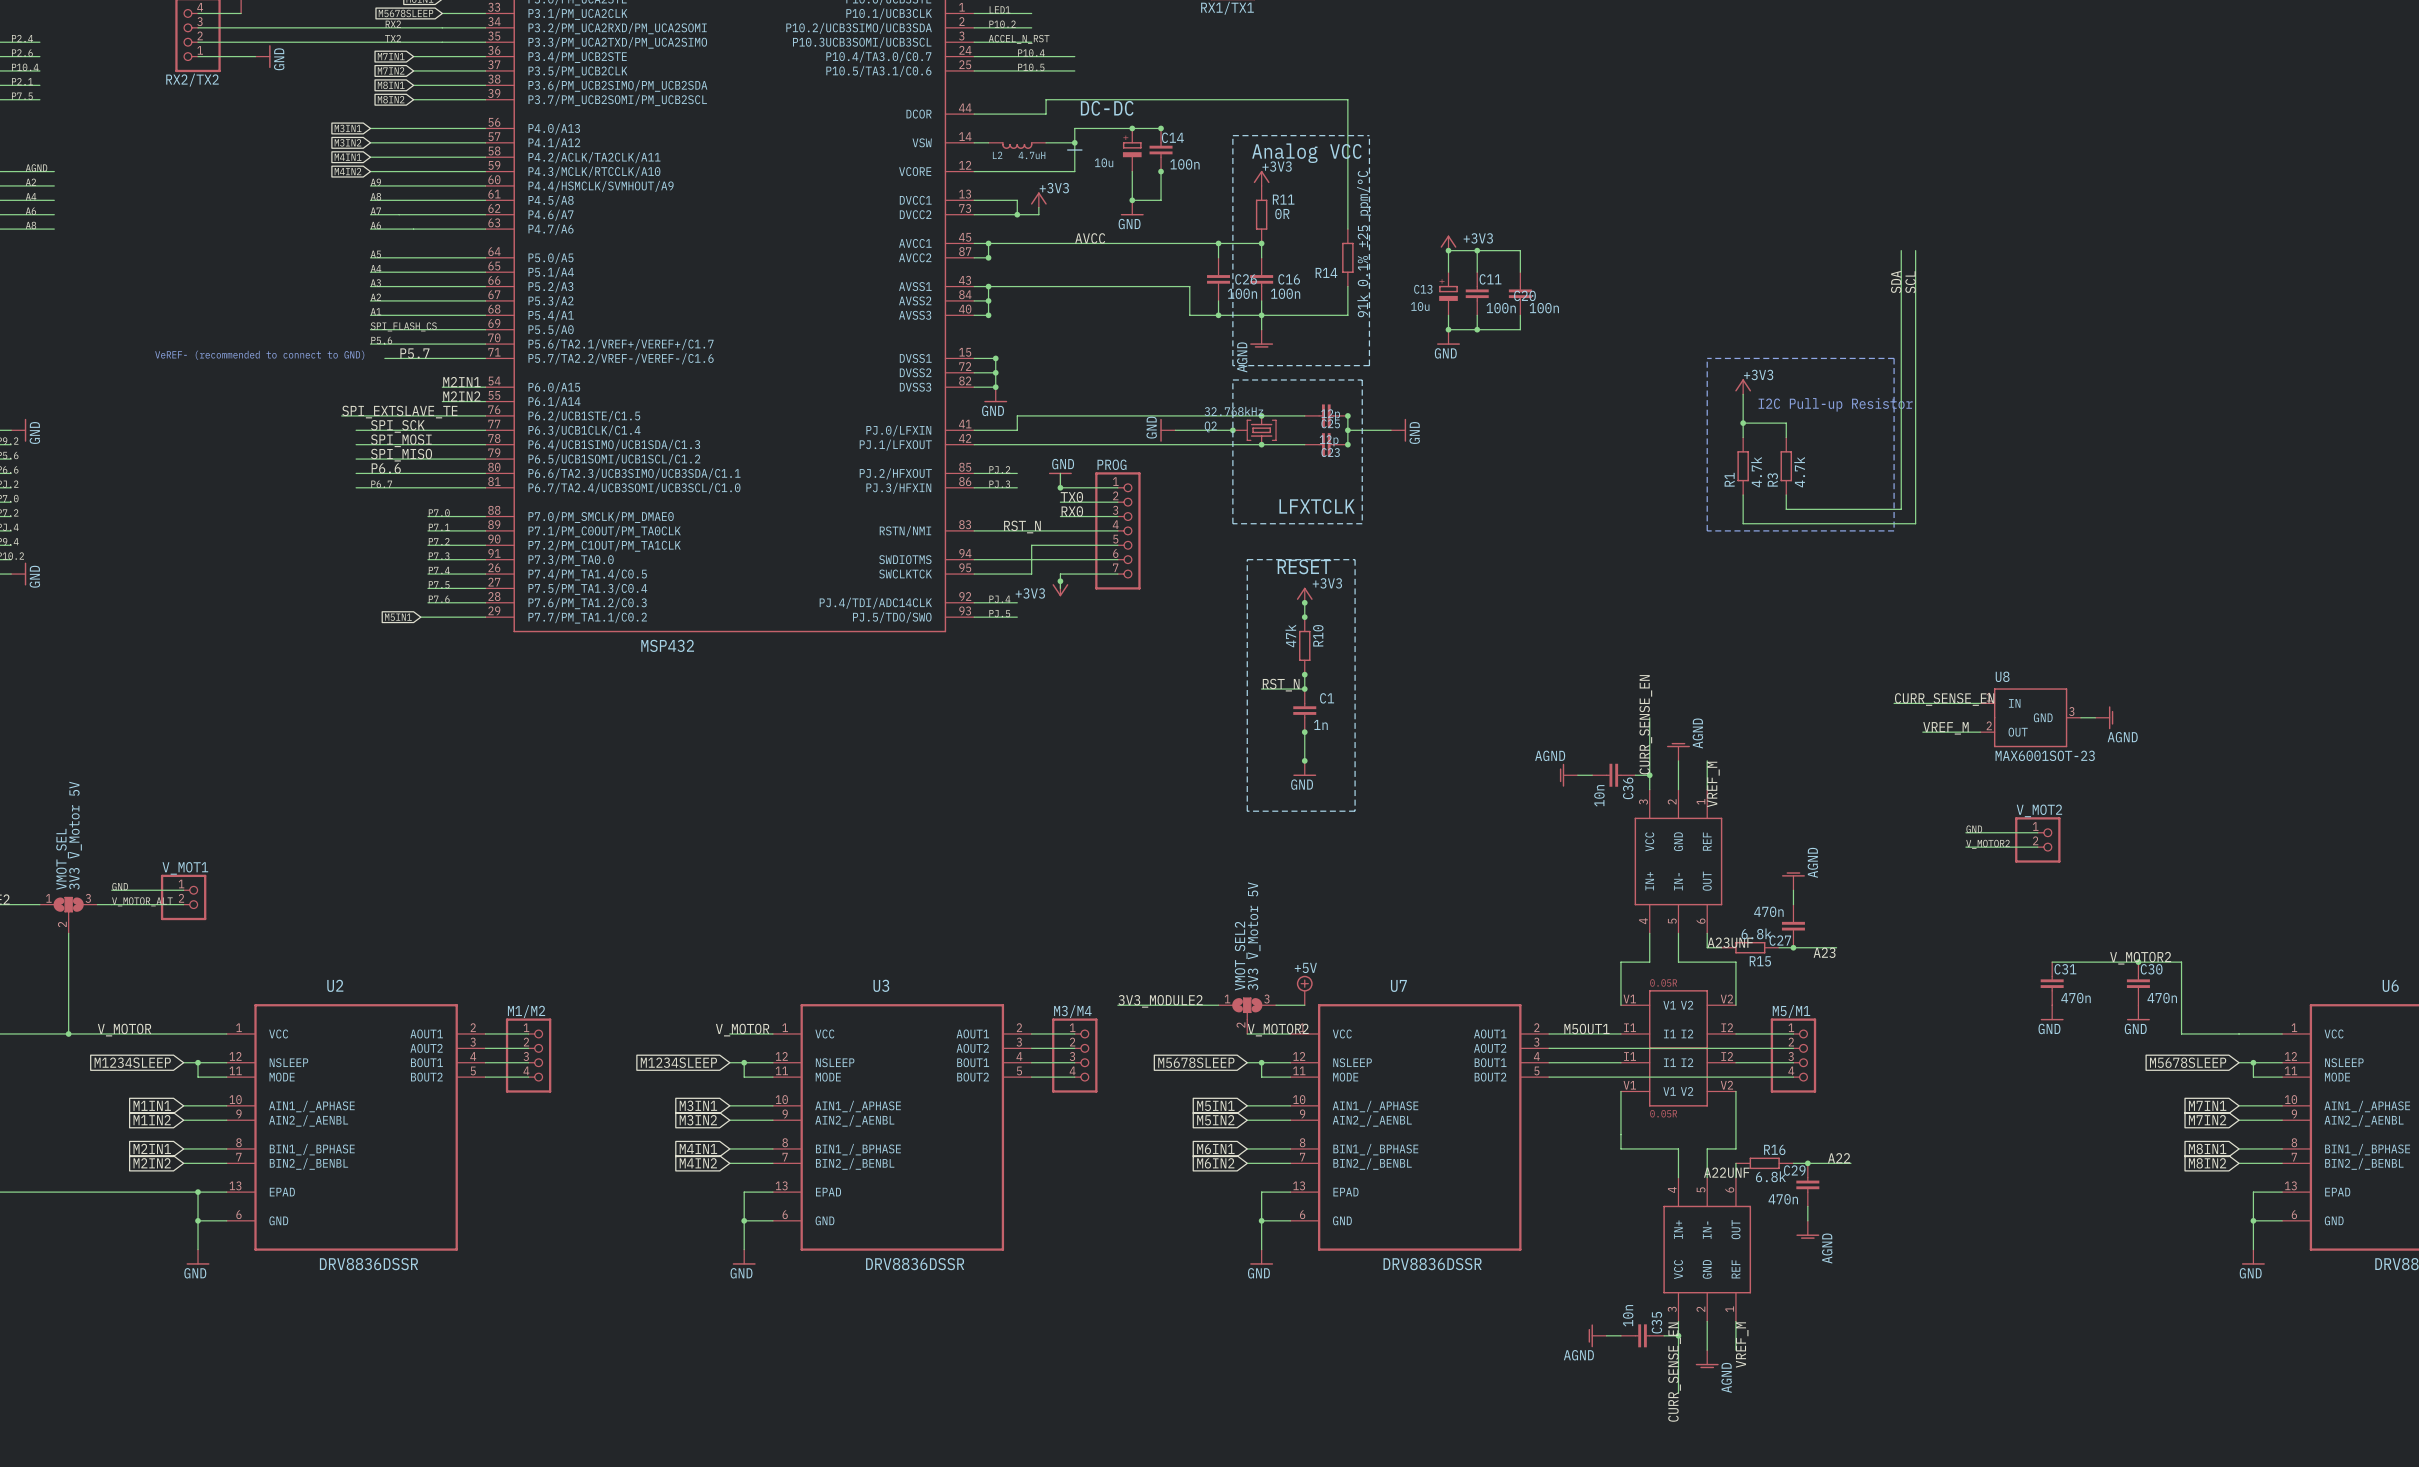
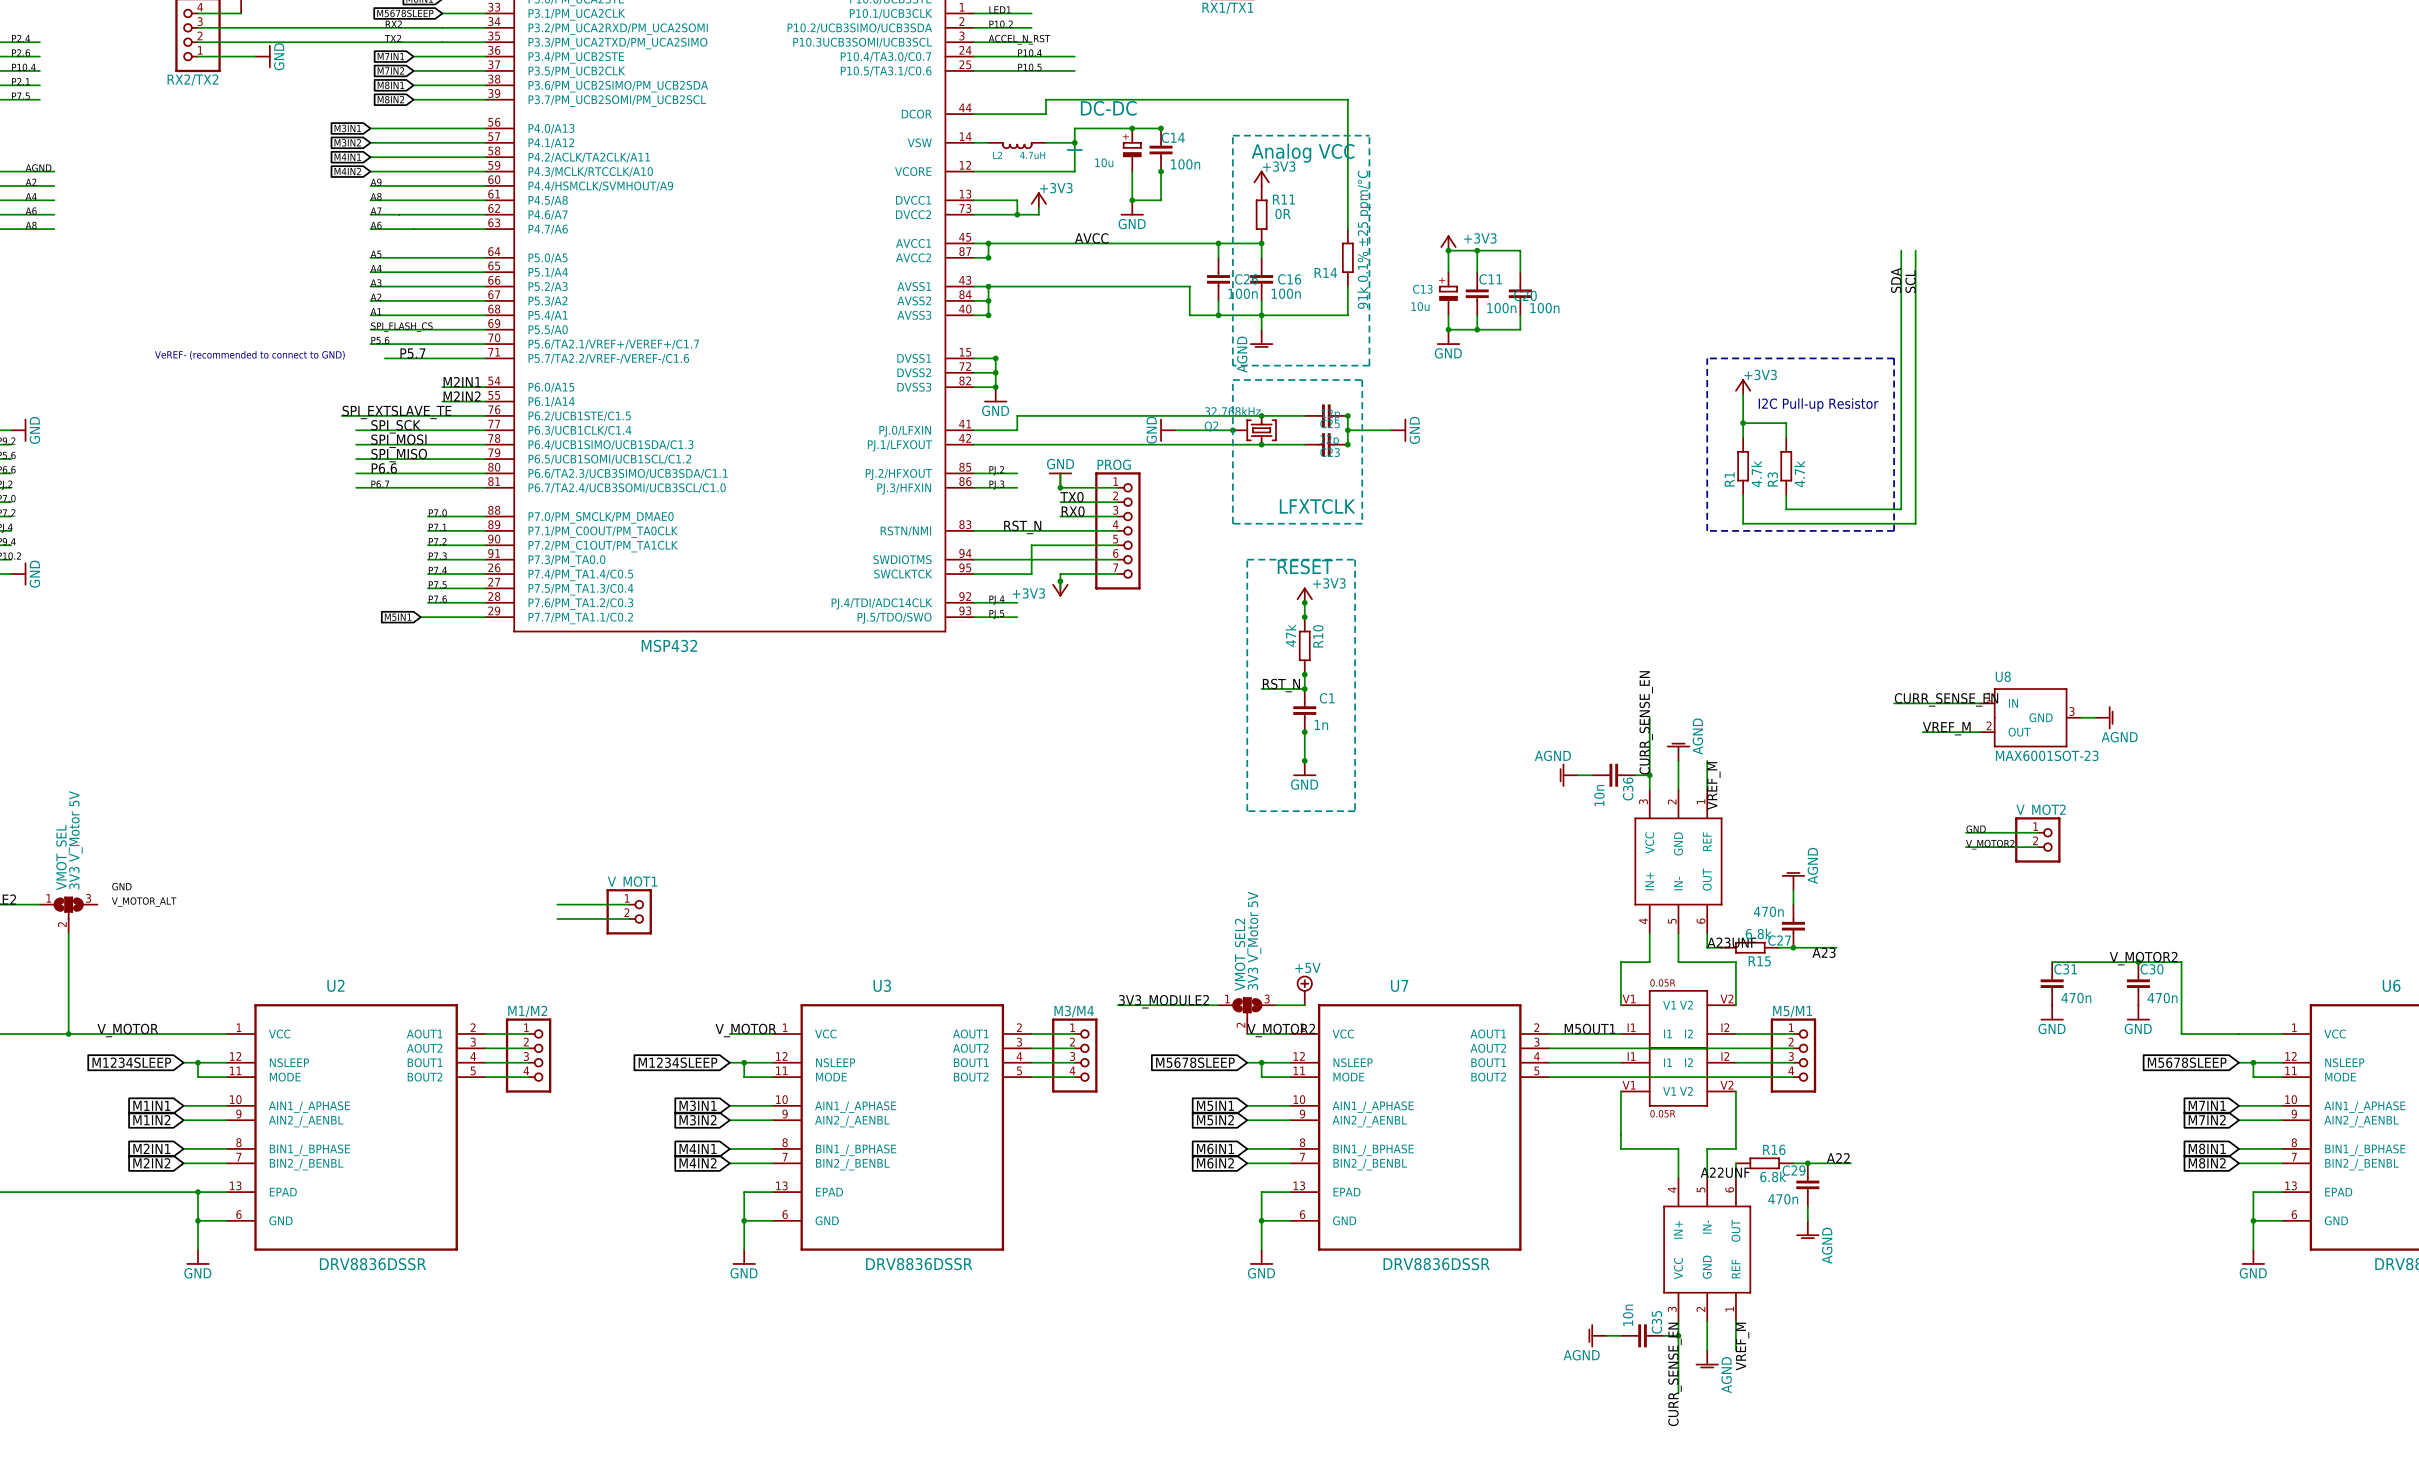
wire: (111, 890) (183, 890) -> none
V_MOT1 position: (183, 897) -> (629, 911)
wire: (97, 904) (183, 904) -> none
wire: none -> (557, 904) (629, 904)
wire: none -> (557, 919) (629, 919)

